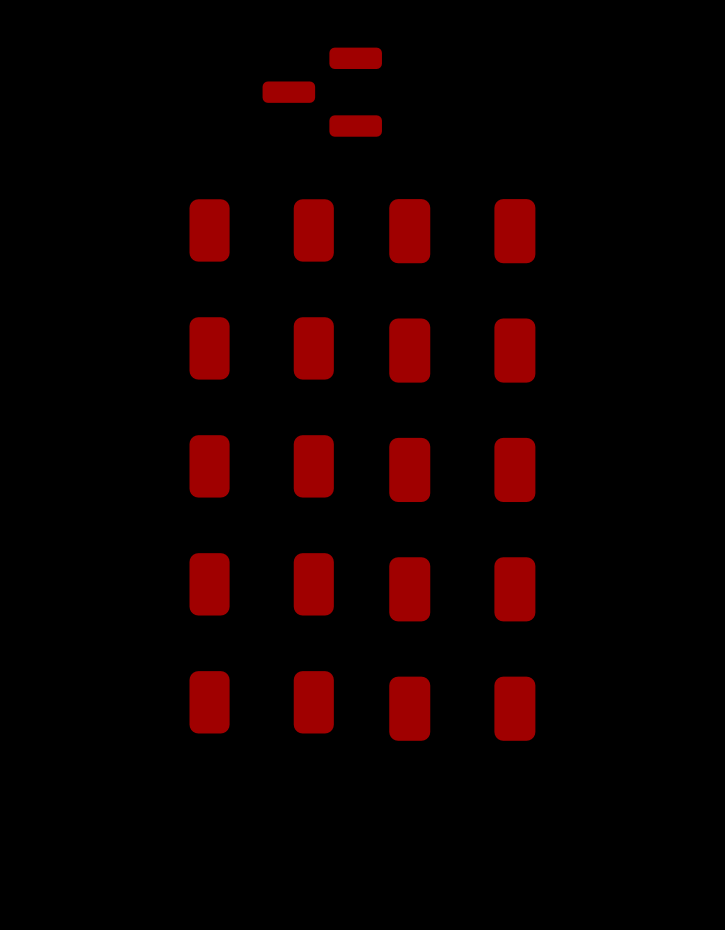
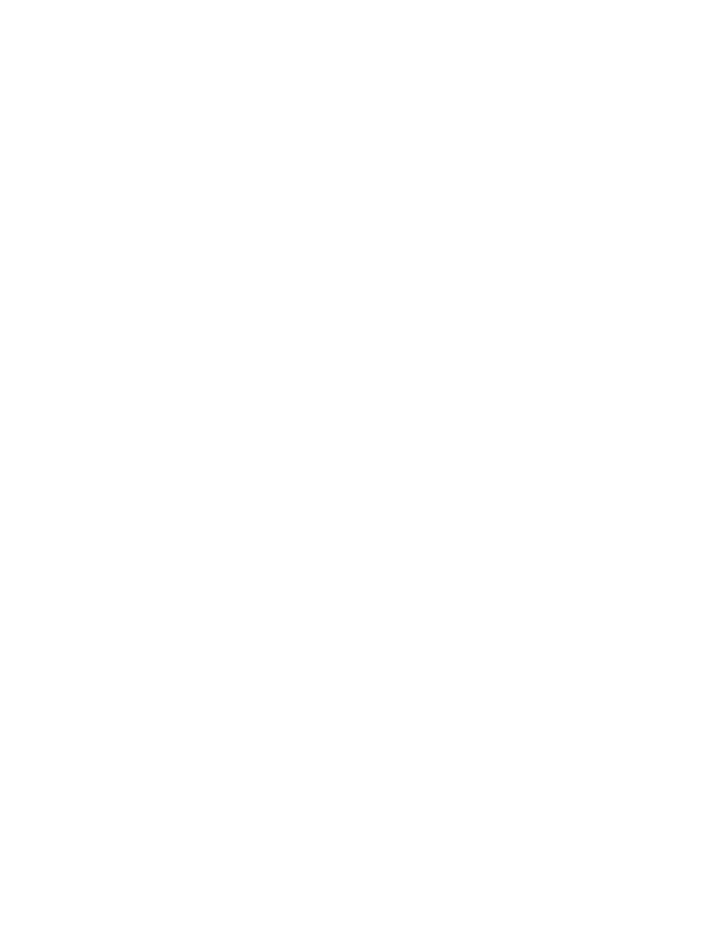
part: (322, 92) -> none
part: (261, 230) -> none
part: (462, 231) -> none
part: (261, 348) -> none
part: (462, 350) -> none
part: (261, 466) -> none
part: (462, 469) -> none
part: (261, 584) -> none
part: (462, 589) -> none
part: (261, 702) -> none
part: (462, 708) -> none

